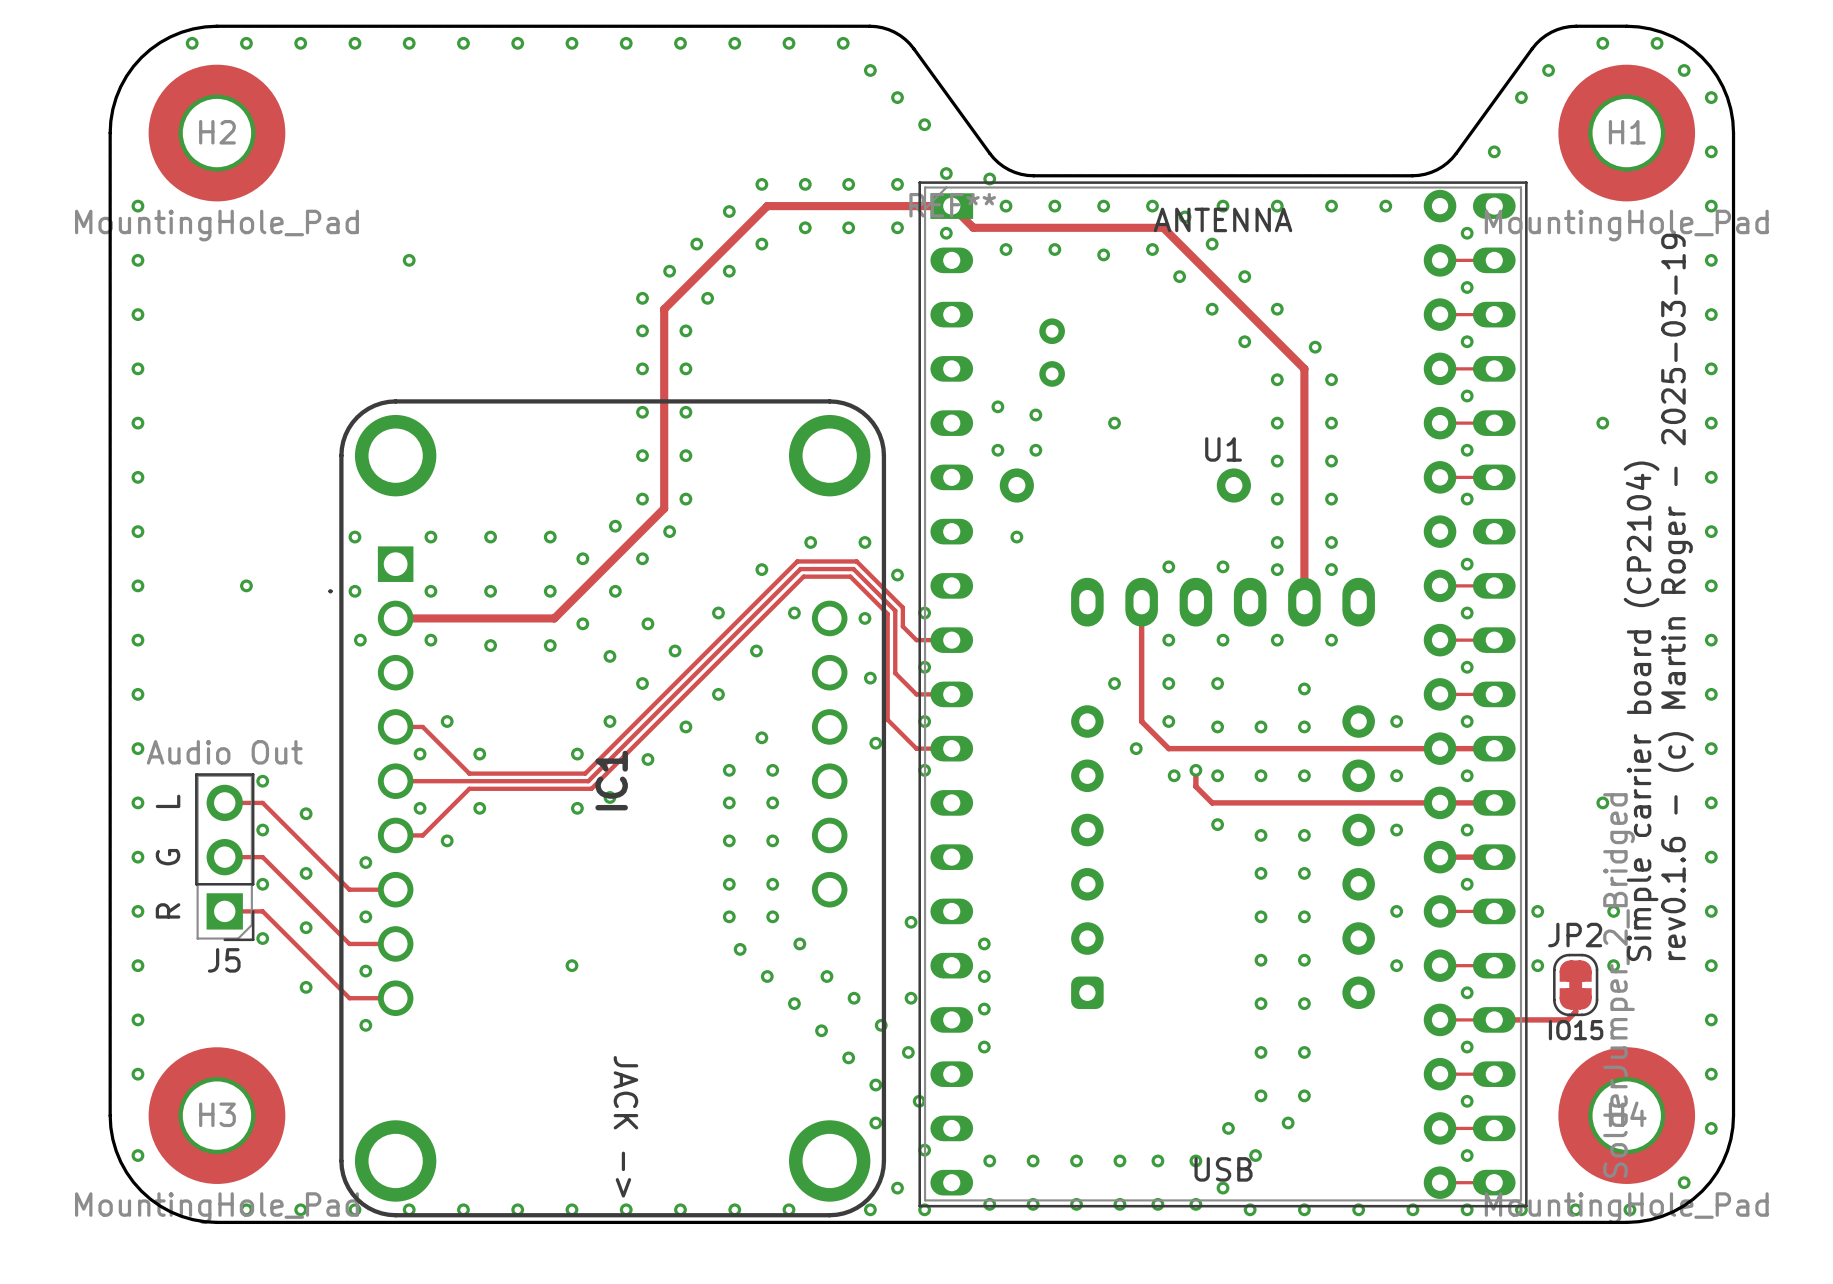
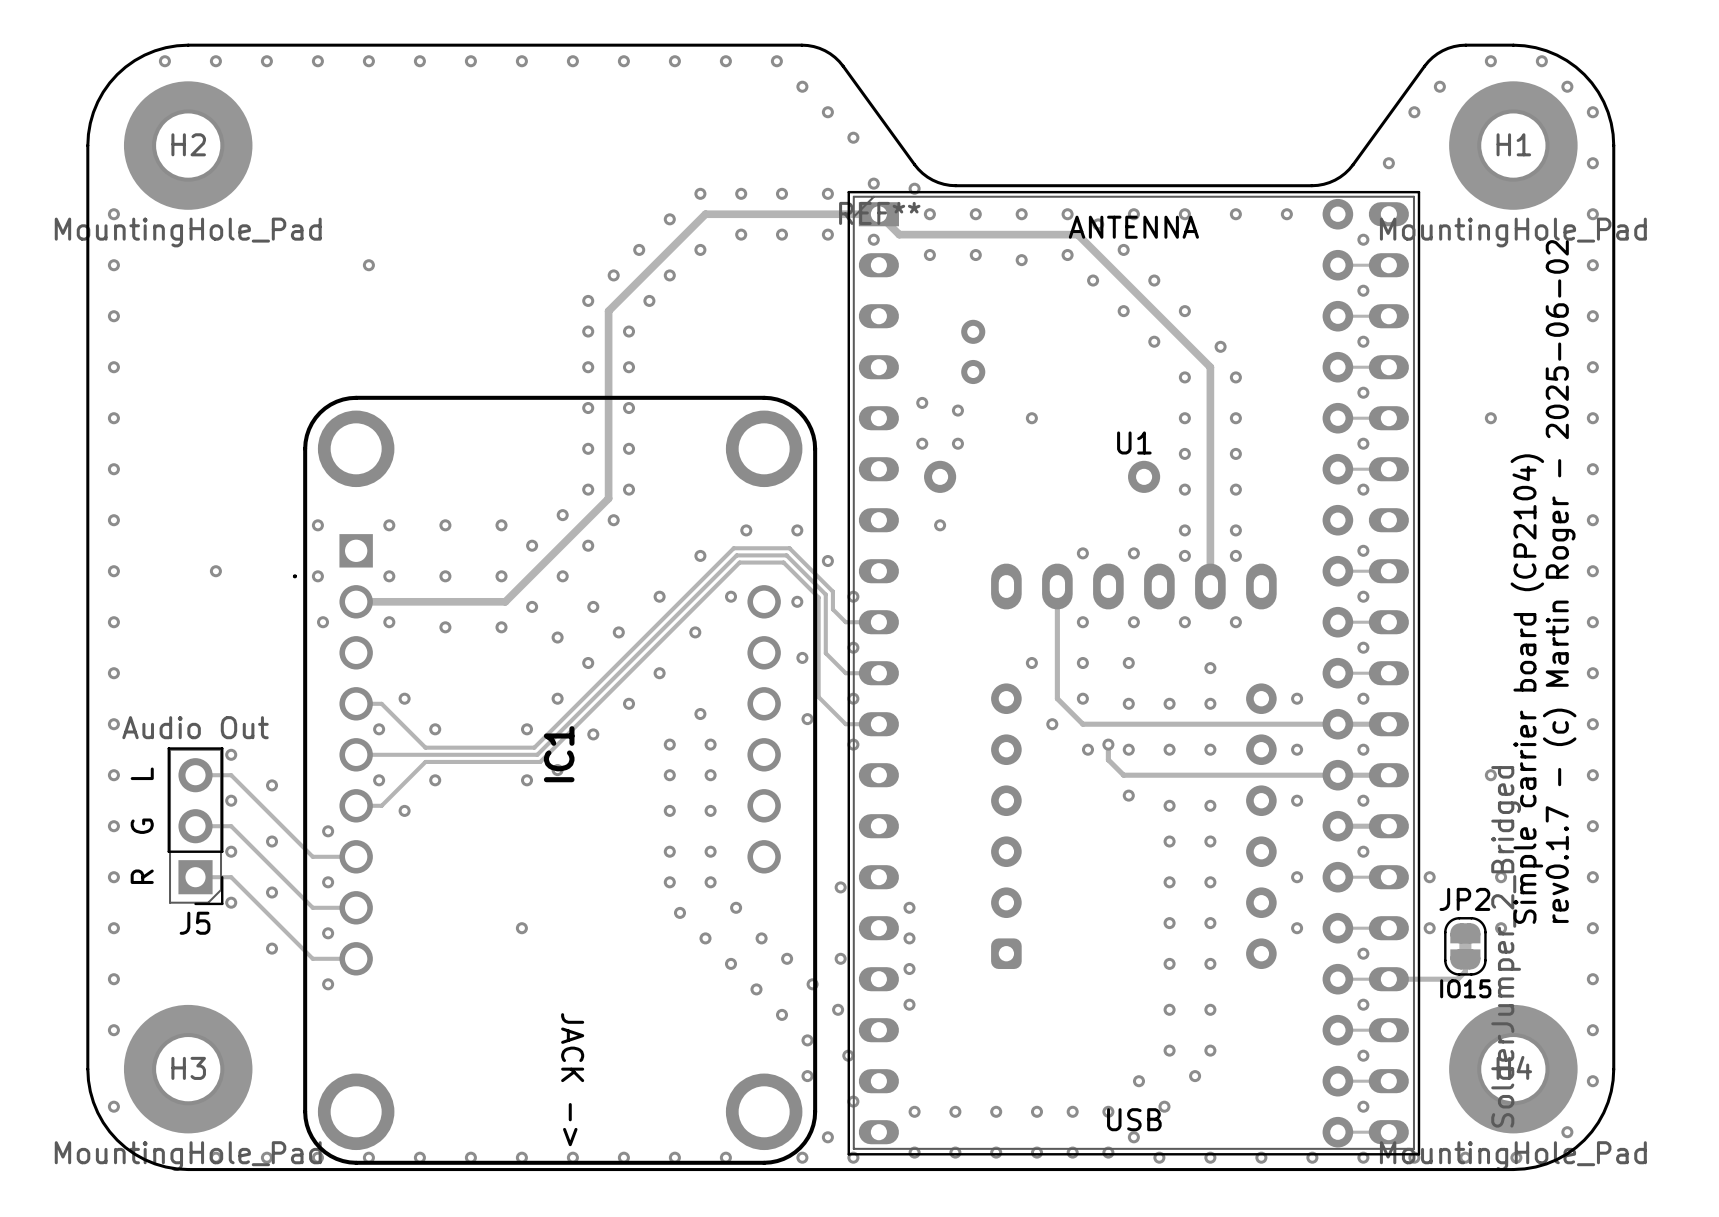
text: rev0.1.6 - (c) Martin Roger - 2025-03-19 (1675, 596) -> rev0.1.7 - (c) Martin Roger - 2025-06-02 (1559, 581)

